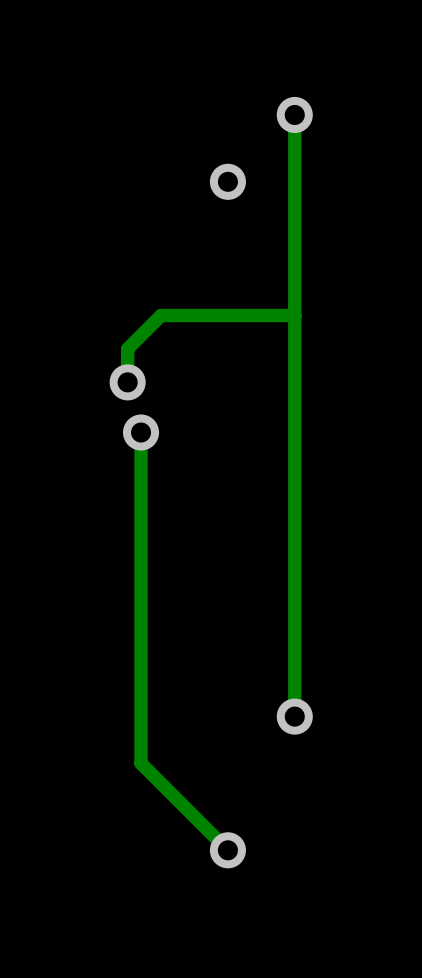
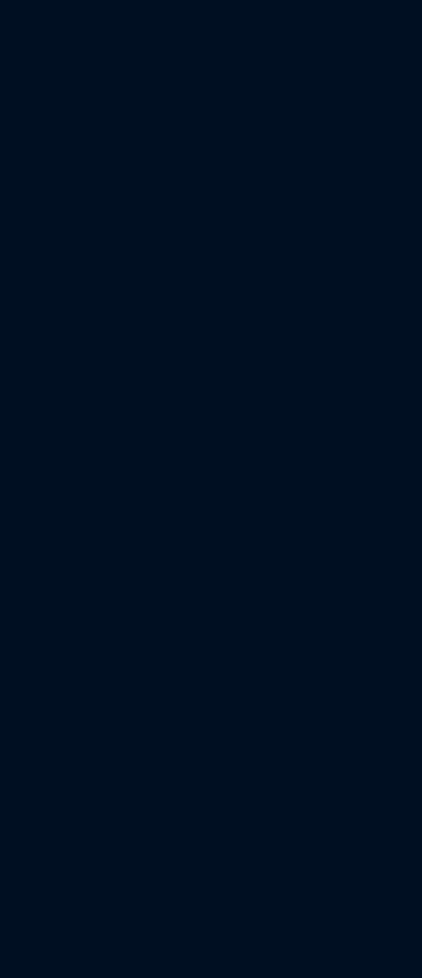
track: (294, 114) (294, 716) -> none
via: (294, 114) -> none
via: (227, 181) -> none
track: (294, 315) (161, 315) (127, 348) (127, 382) -> none
via: (127, 382) -> none
track: (141, 432) (141, 763) (227, 850) -> none
via: (141, 432) -> none
via: (294, 716) -> none
via: (227, 850) -> none

